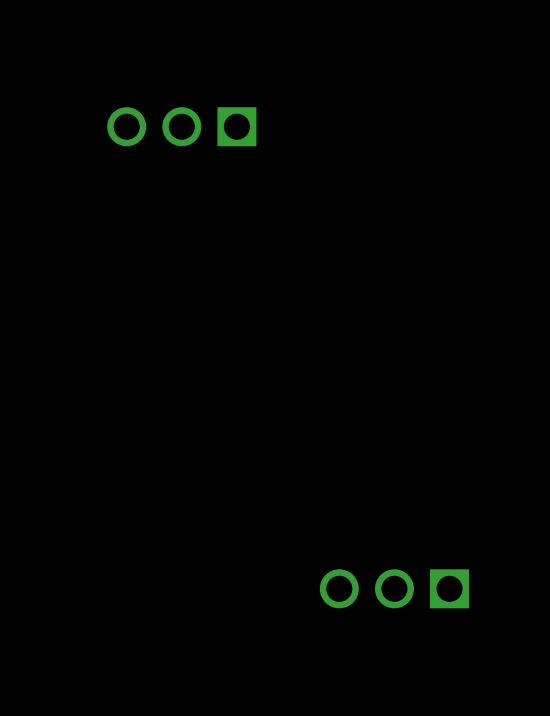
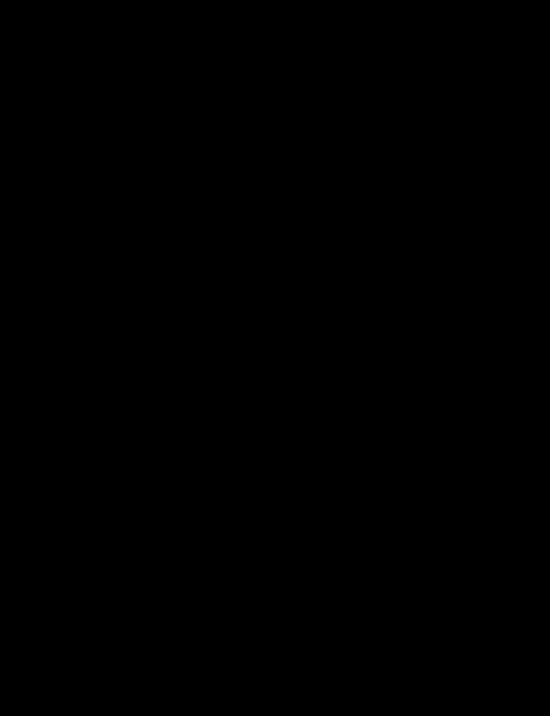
part: (181, 126) -> none
part: (394, 588) -> none

